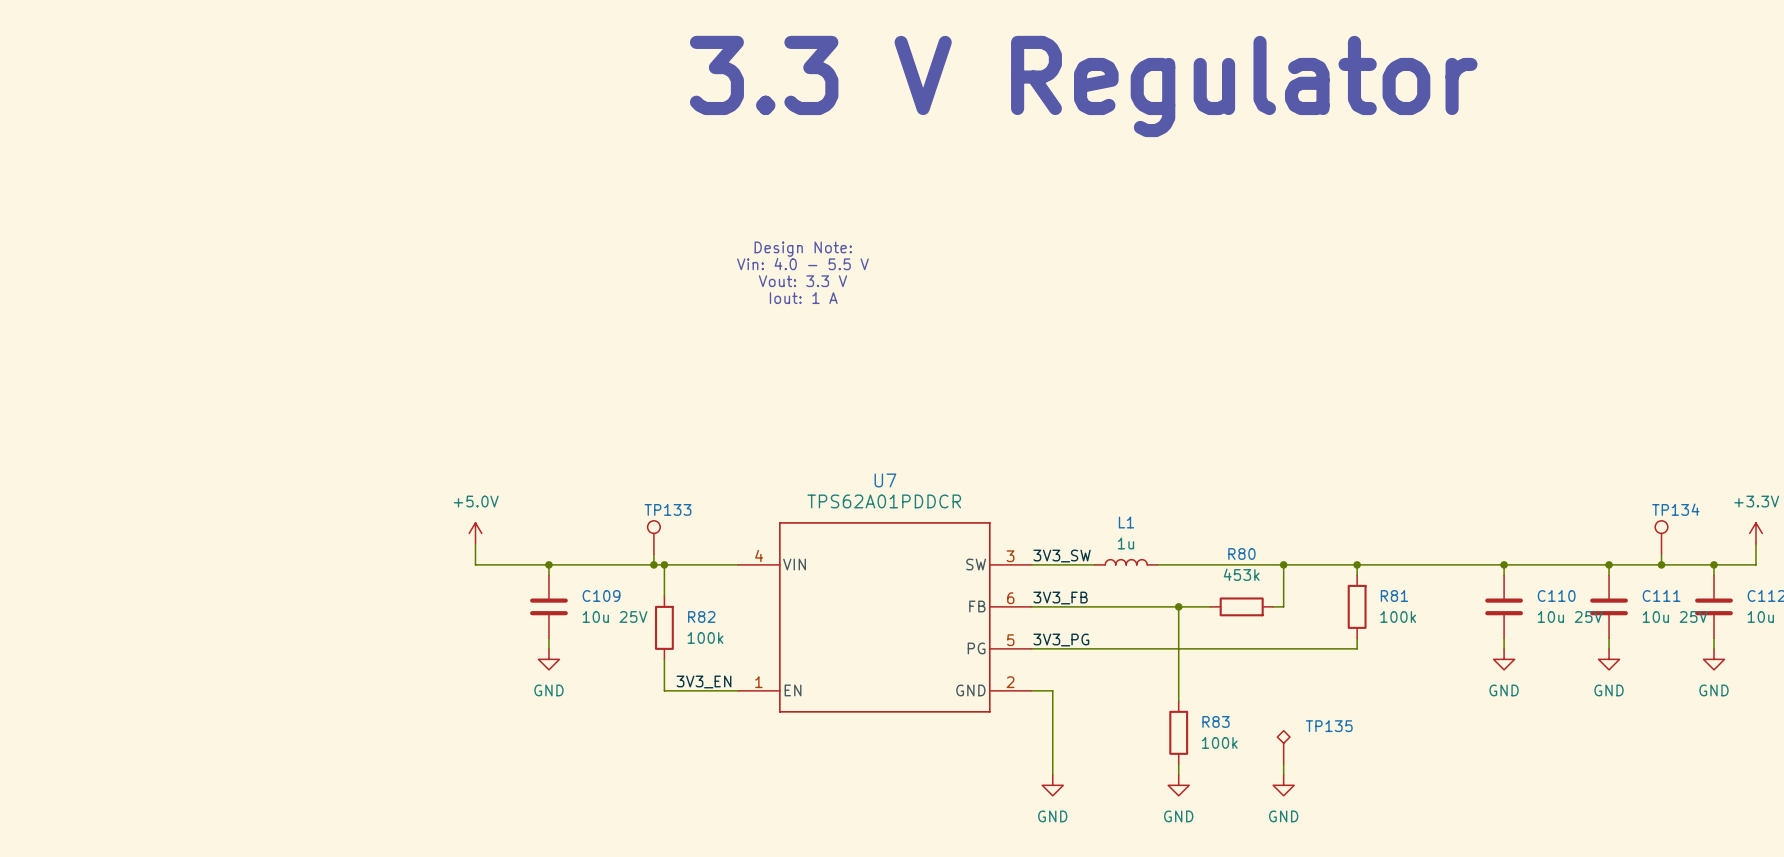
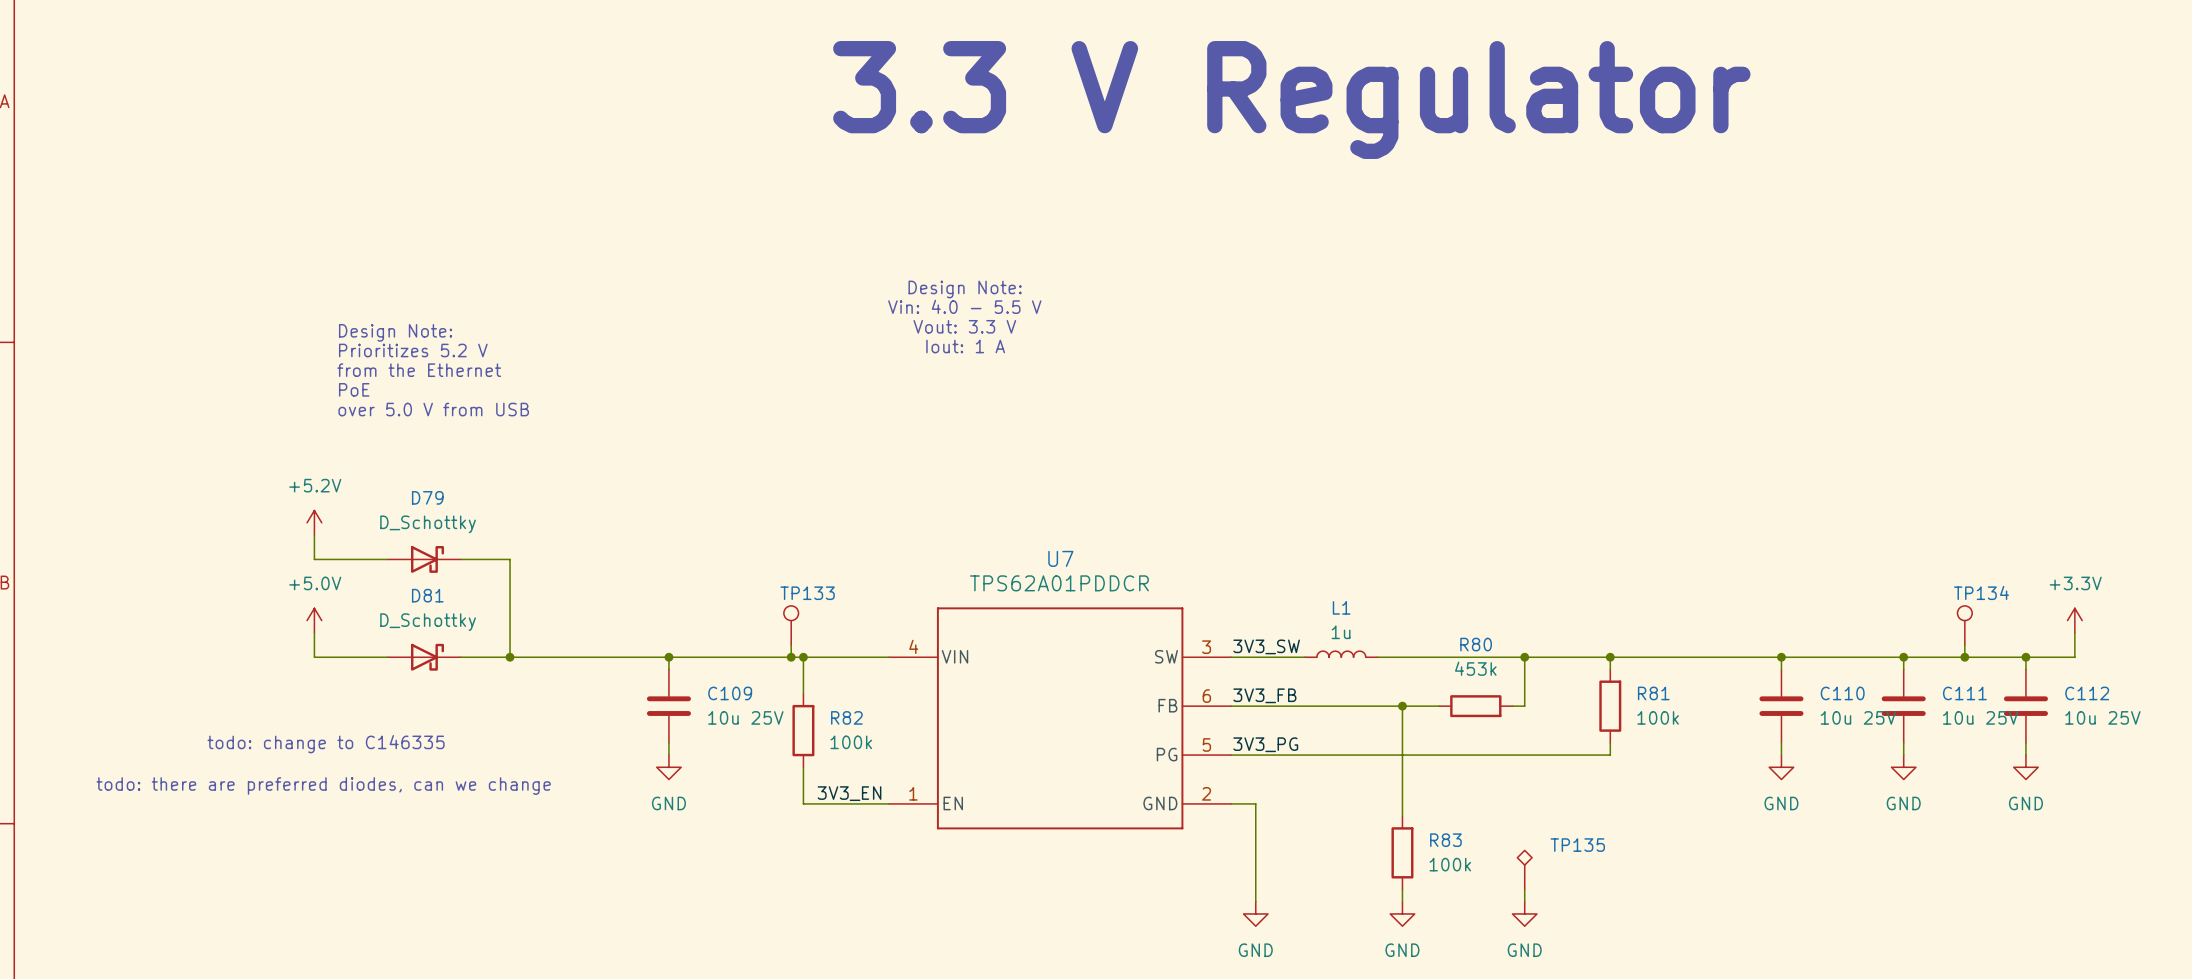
text: none -> Design Note: (395, 332)
text: none -> Prioritizes 5.2 V (413, 350)
text: none -> from the Ethernet (419, 370)
text: none -> PoE (354, 389)
text: none -> over 5.0 V from USB (433, 409)
power symbol: none -> +5.2V (314, 522)
wire: none -> (314, 534) (314, 559) (387, 559)
D79: none -> D_Schottky (424, 559)
wire: none -> (461, 559) (510, 559) (510, 657)
power symbol: none -> +5.0V (314, 620)
power symbol: +5.0V (475, 533) -> none
wire: none -> (314, 632) (314, 657) (387, 657)
wire: (475, 543) (475, 564) -> (461, 657) (583, 657)
D81: none -> D_Schottky (424, 657)
junction: none -> (510, 657)
text: none -> todo: change to C146335 (326, 744)
text: none -> todo: there are preferred diodes, can we change (323, 786)

